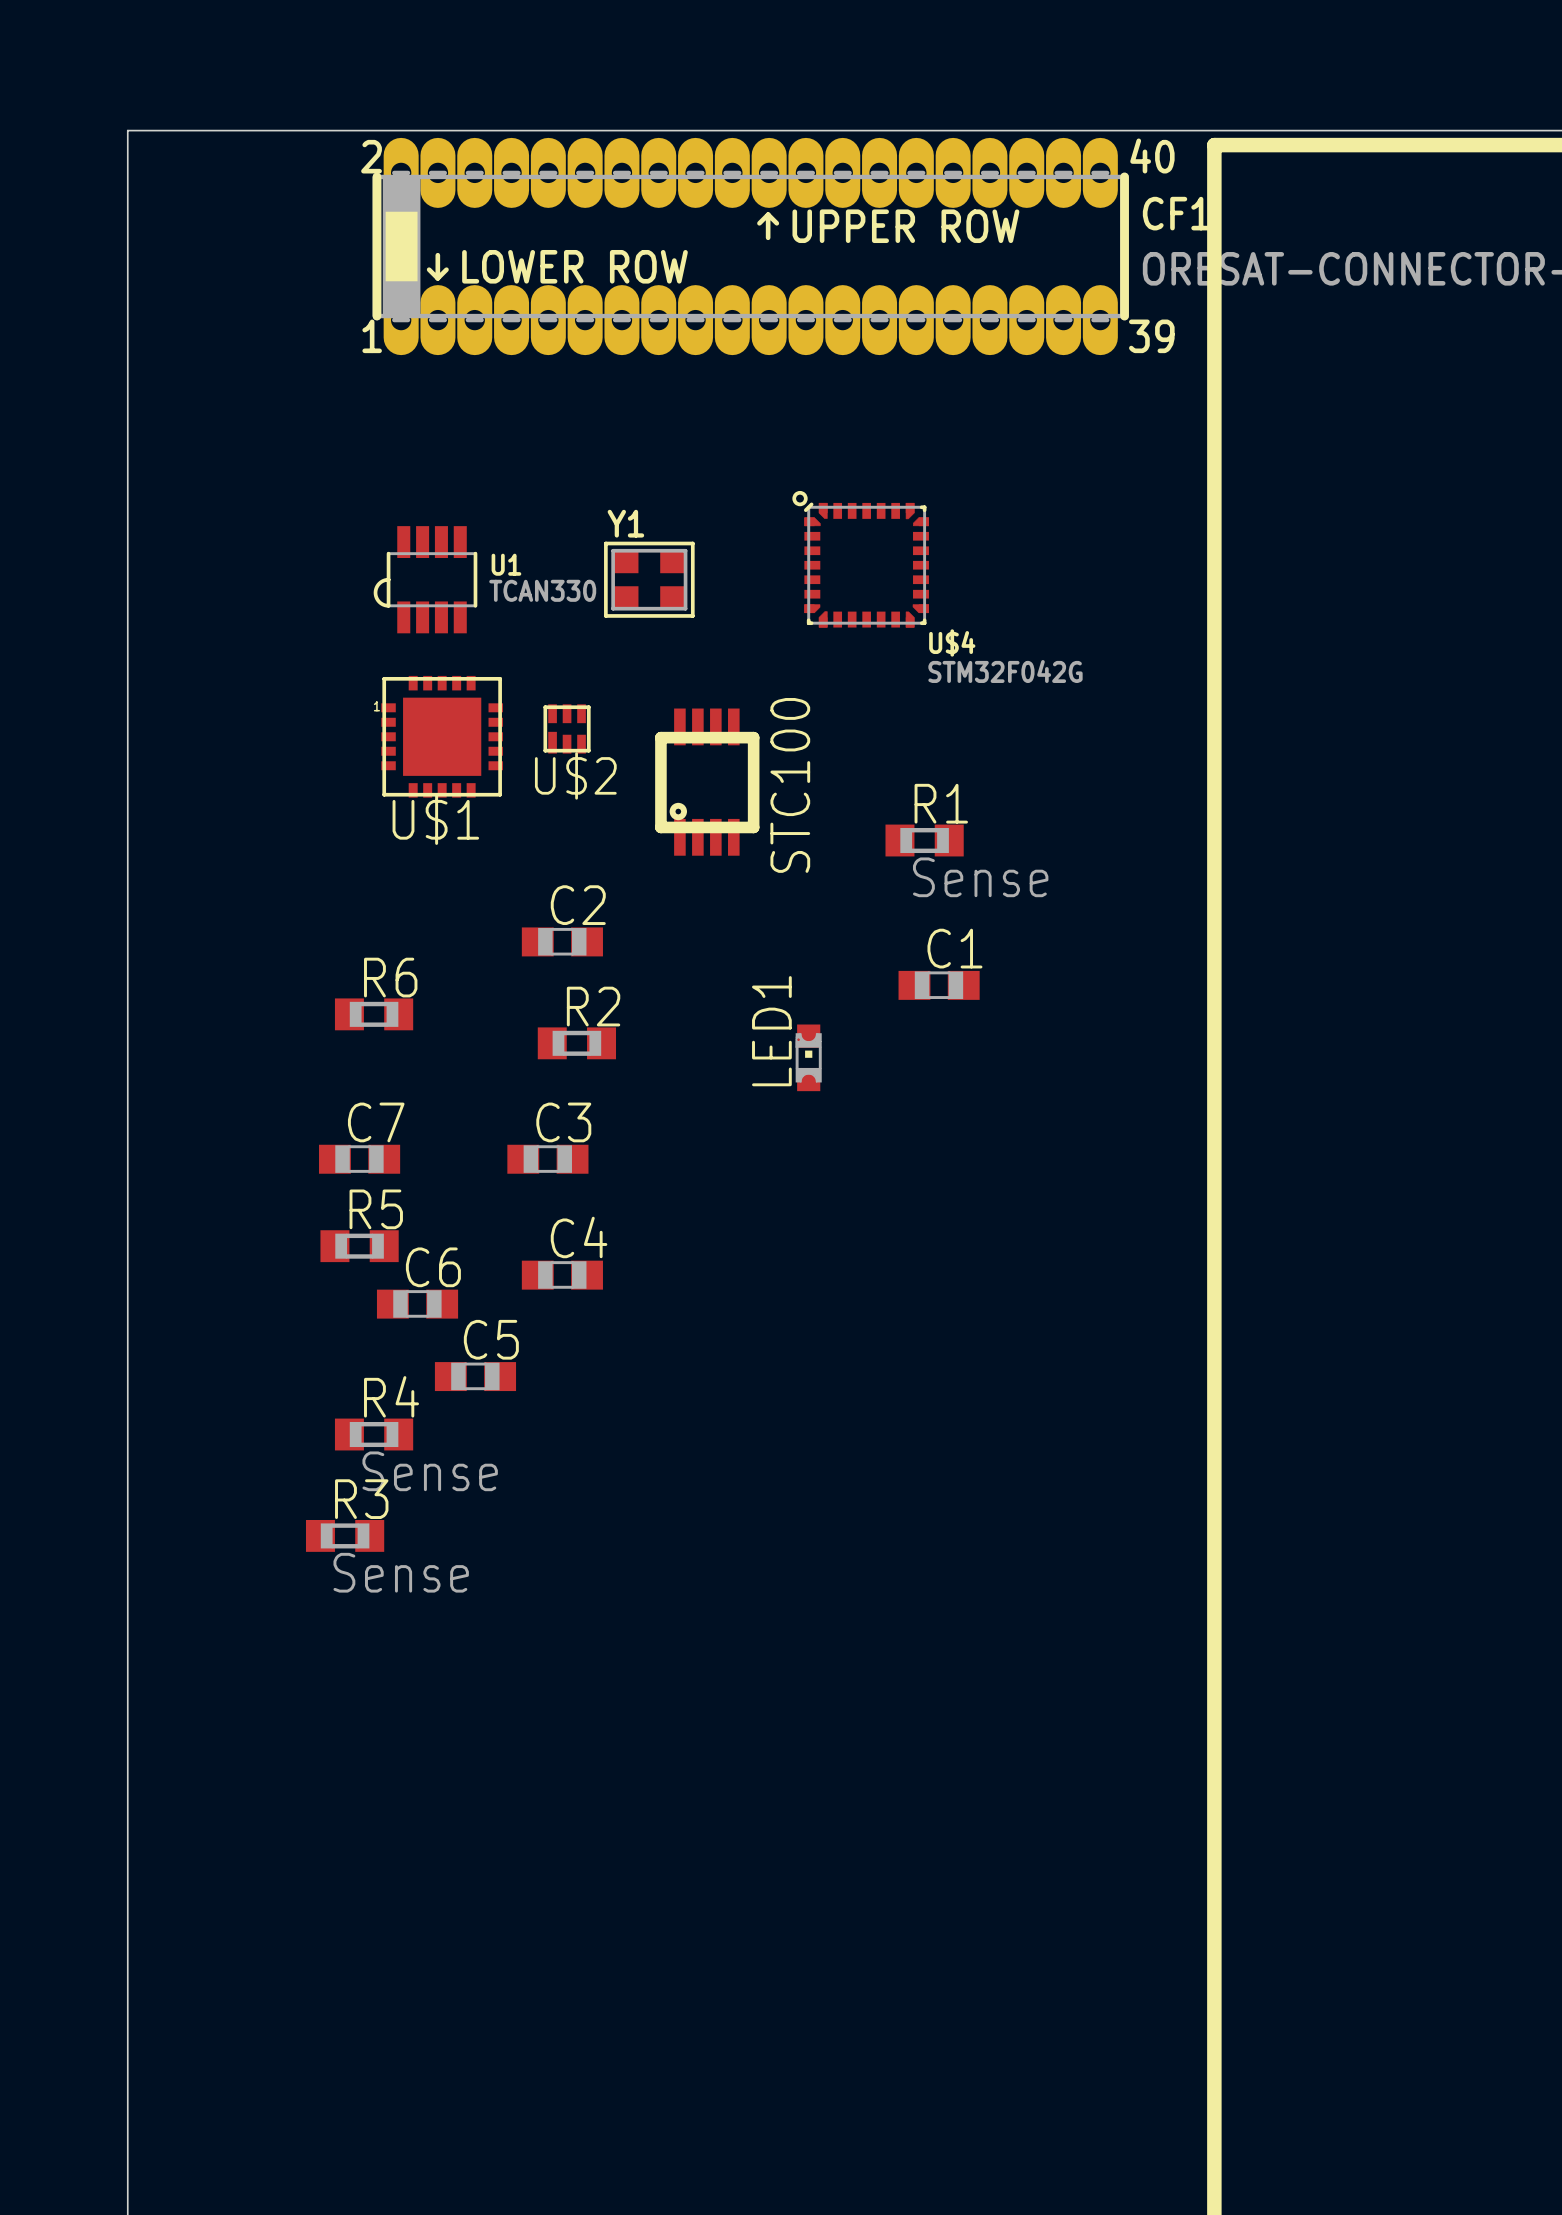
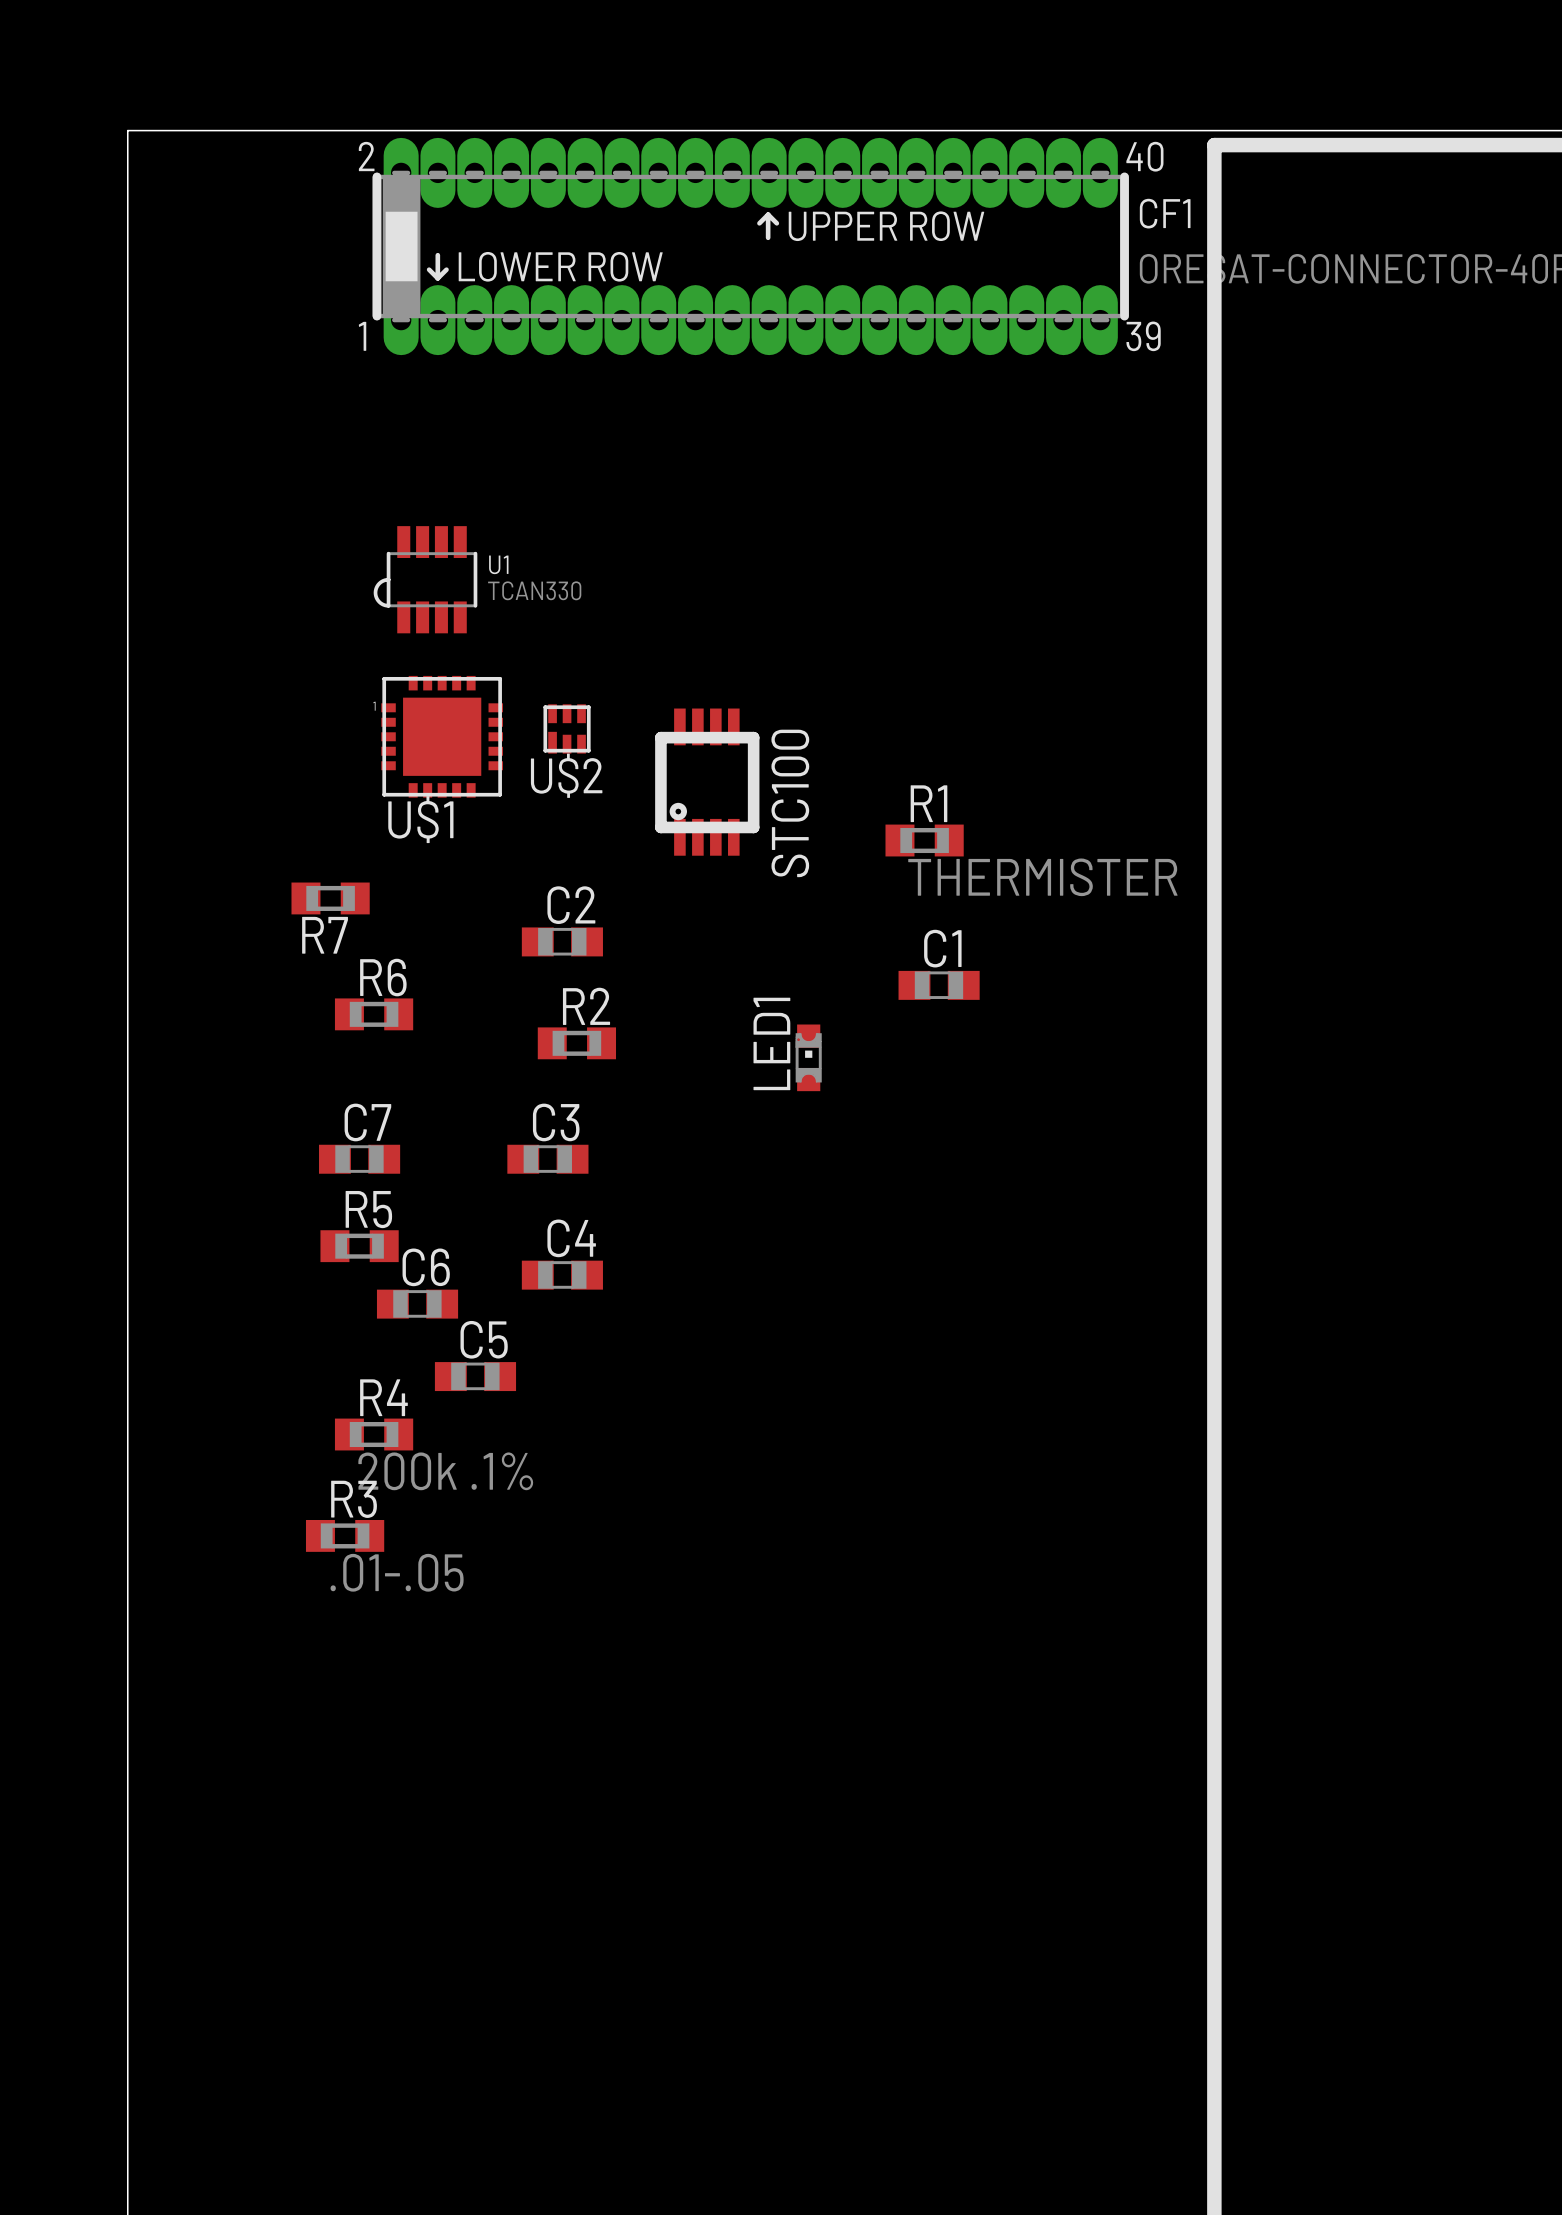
U$4: STM32F042G (860, 559) -> none
Y1: (649, 579) -> none
R1 value: Sense (980, 877) -> THERMISTER (1042, 877)
R7: none -> (330, 898)
R4 value: Sense (430, 1471) -> 200k .1% (445, 1471)
R3 value: Sense (401, 1572) -> .01-.05 (397, 1572)

